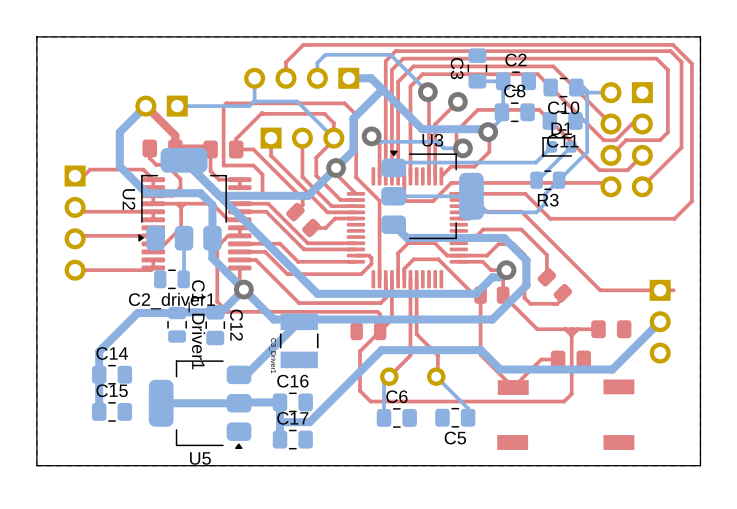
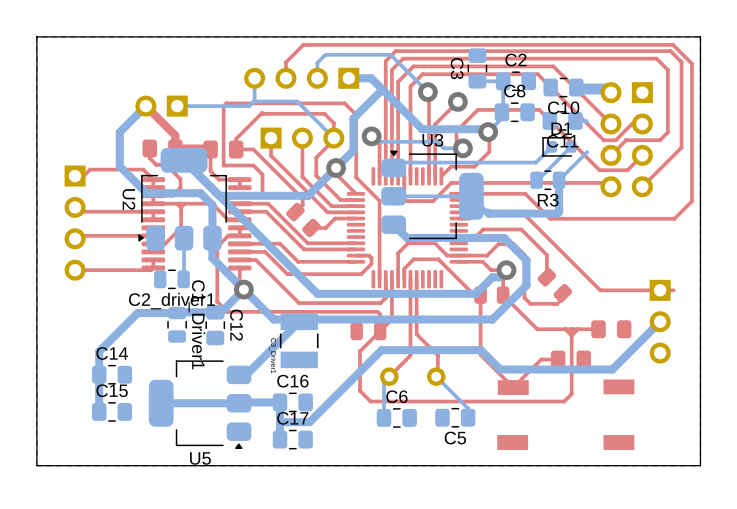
bottom track: (583, 87) (587, 90) (587, 152) -> (583, 87) (605, 87)
bottom track: (559, 180) (545, 194) (545, 203) (536, 212) (487, 212) -> (559, 180) (559, 211) (557, 213) (487, 212)

